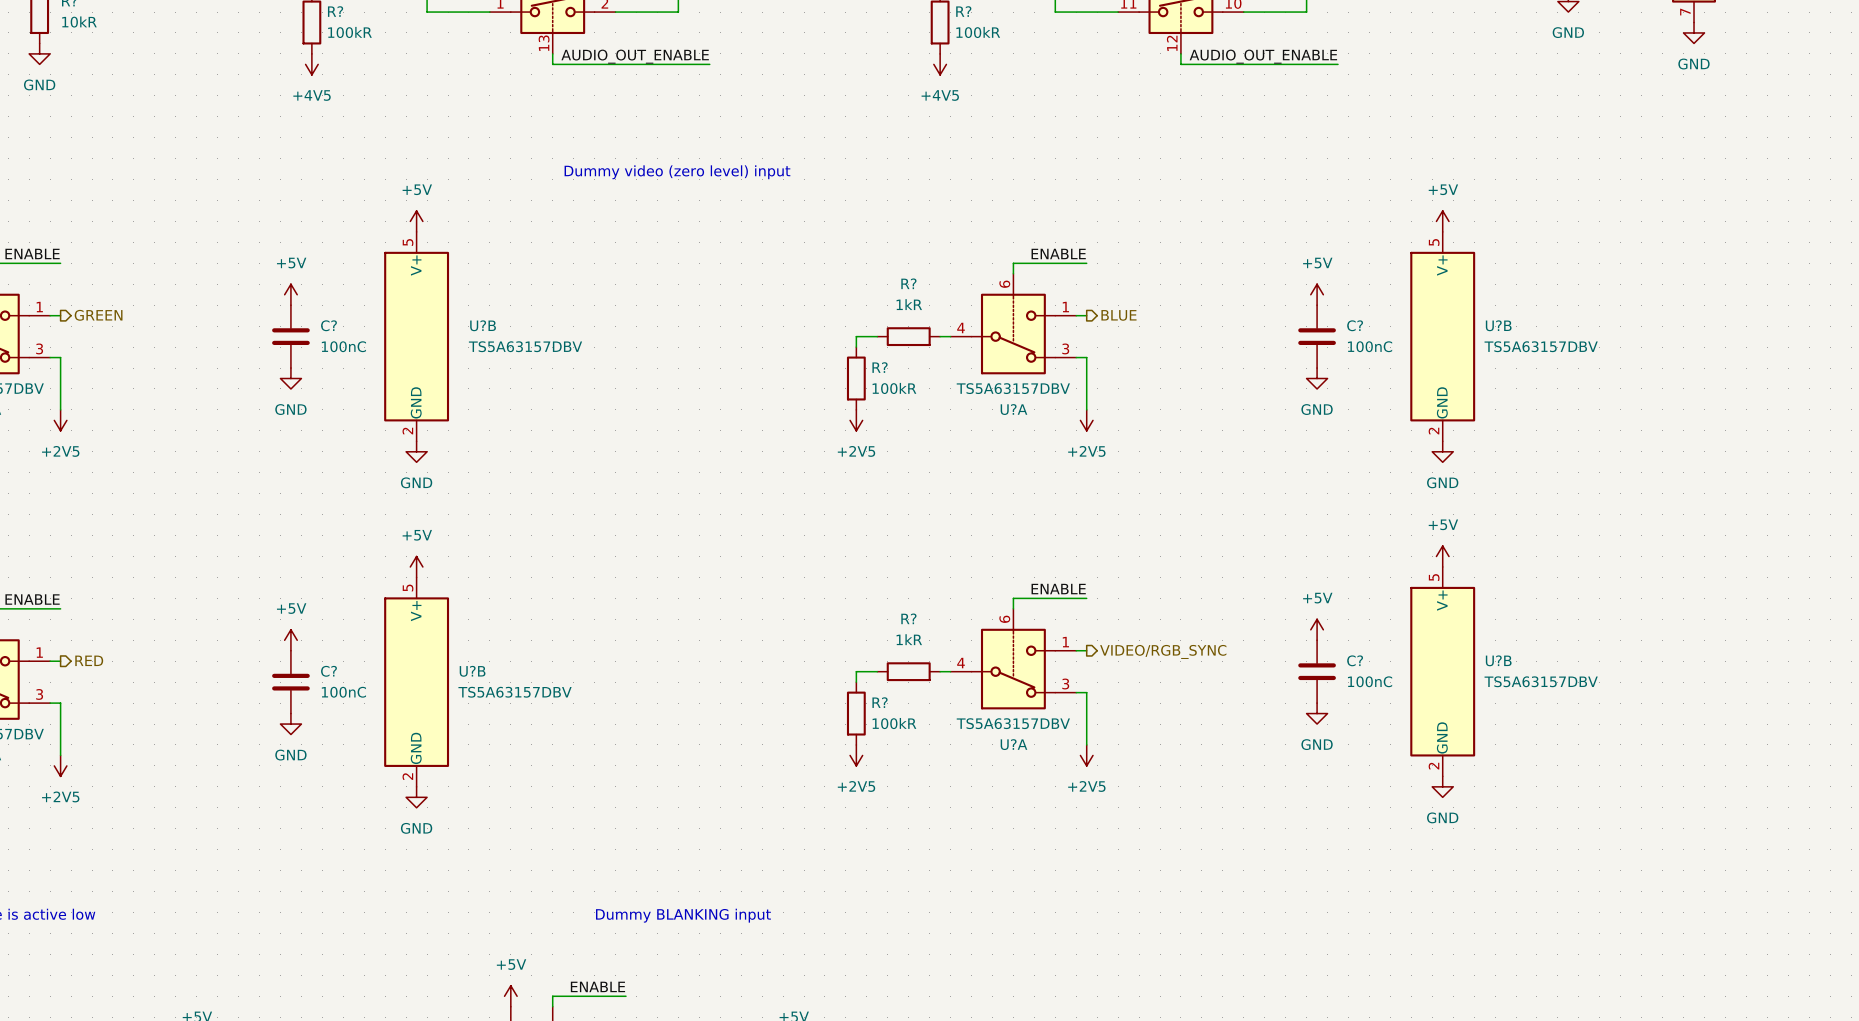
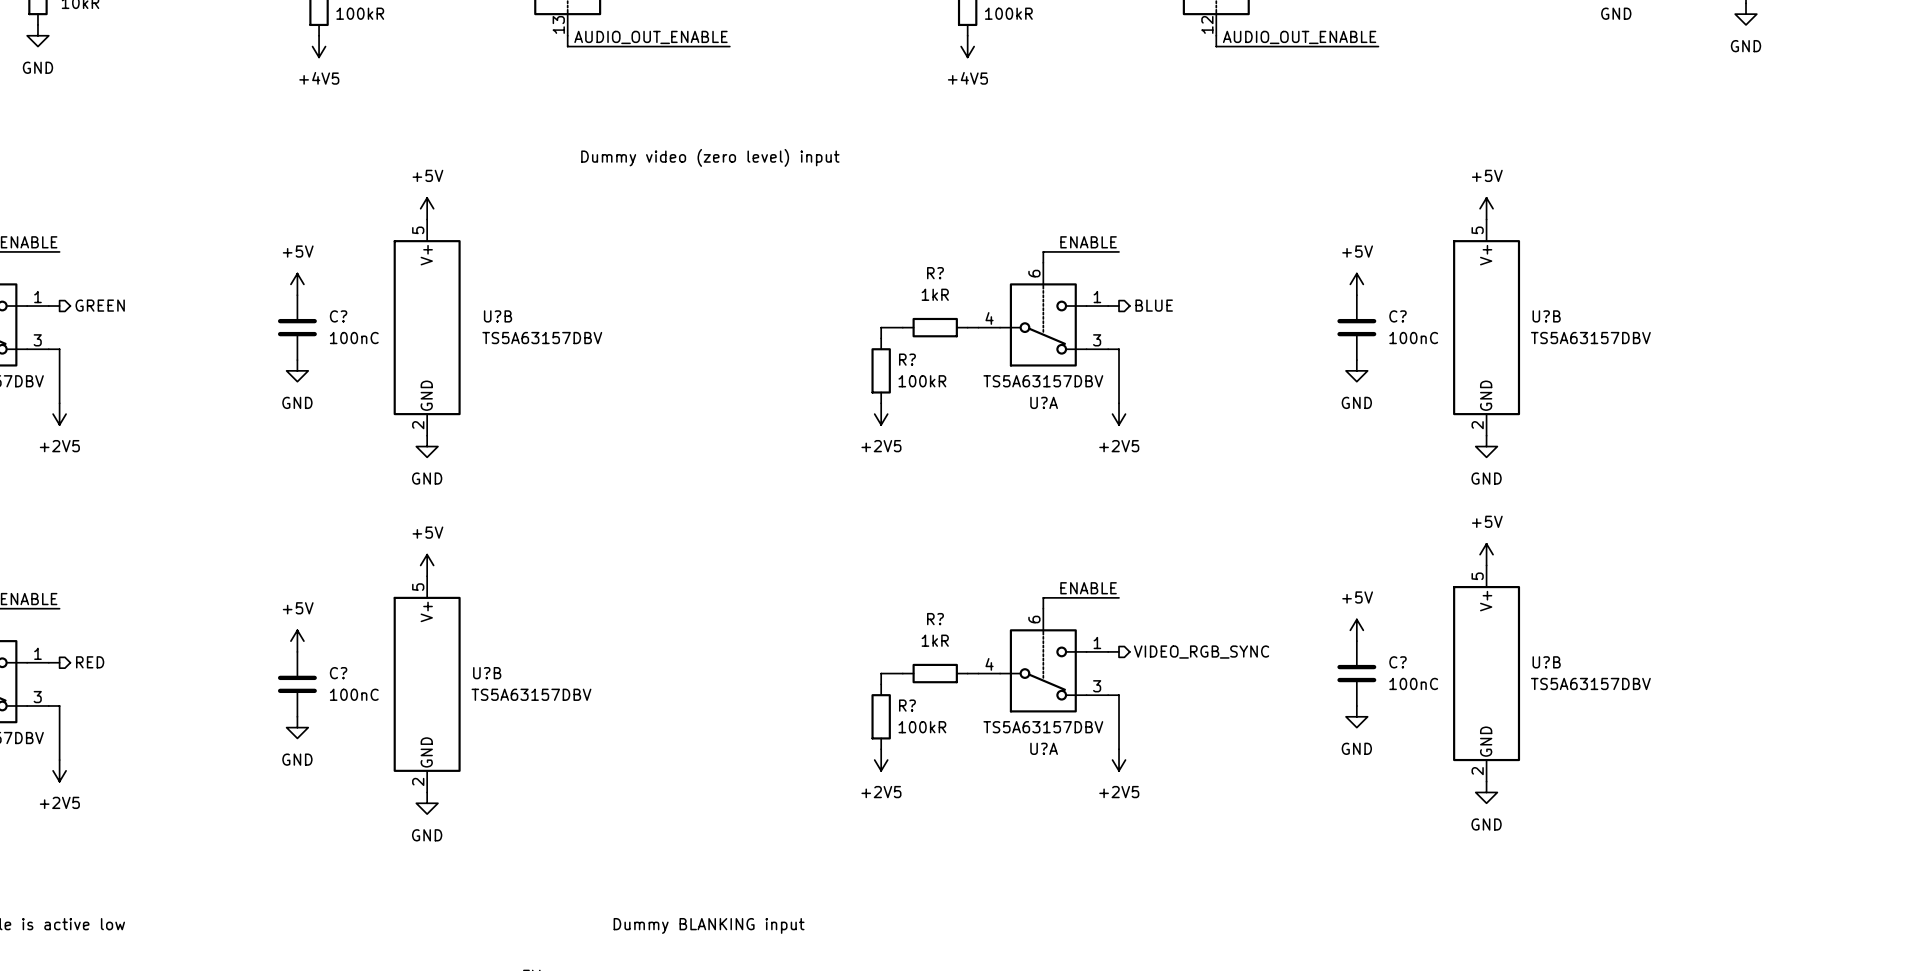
hierarchical label: VIDEO/RGB_SYNC (1163, 651) -> VIDEO_RGB_SYNC (1201, 652)

